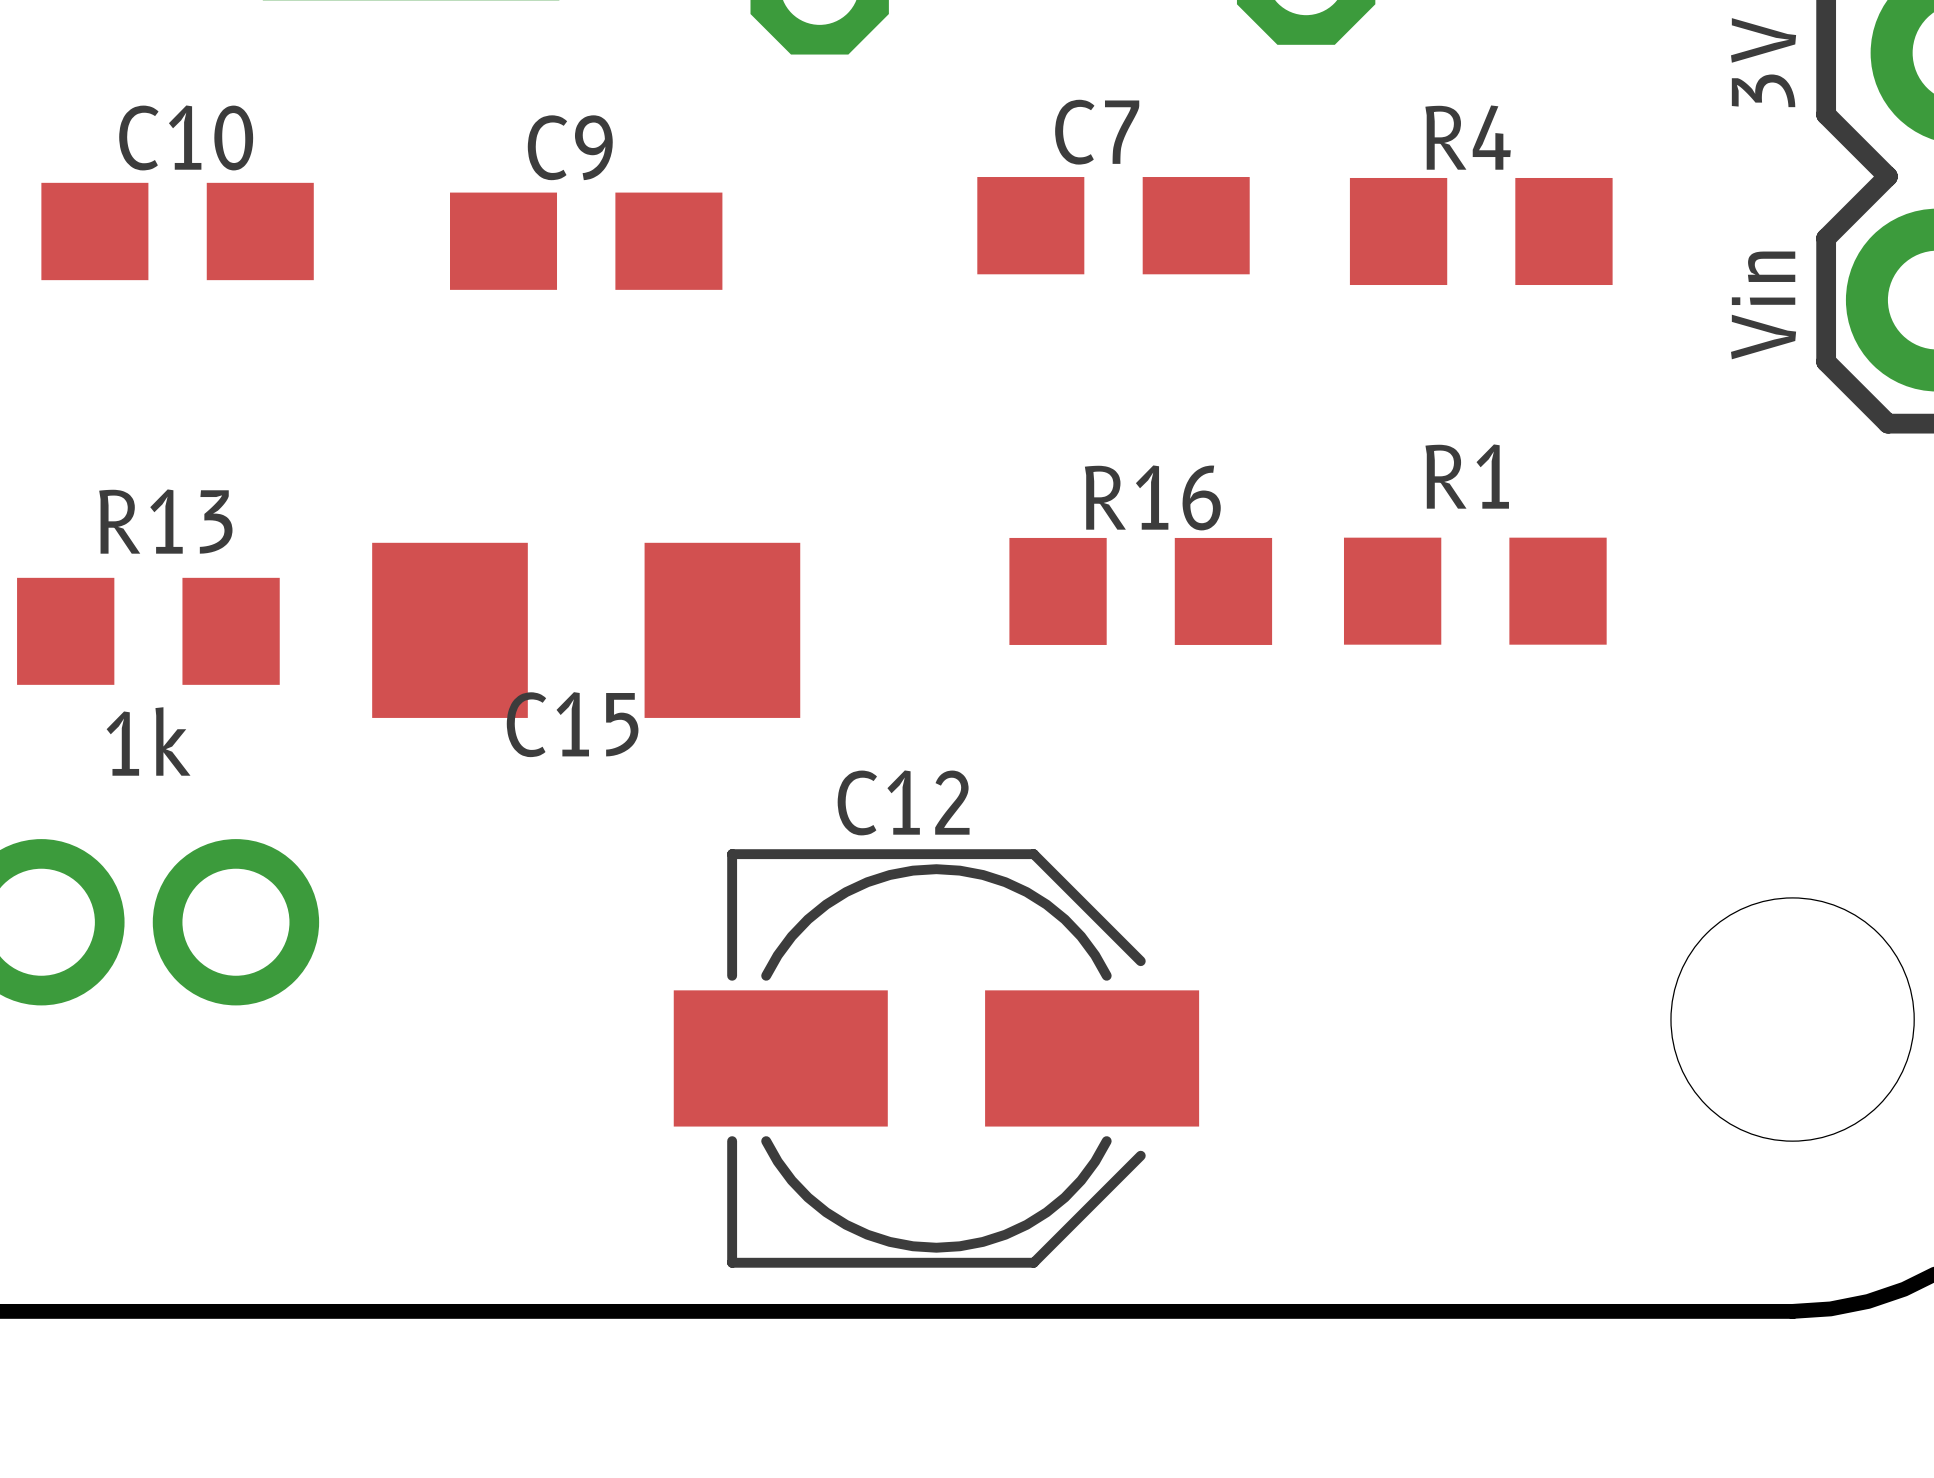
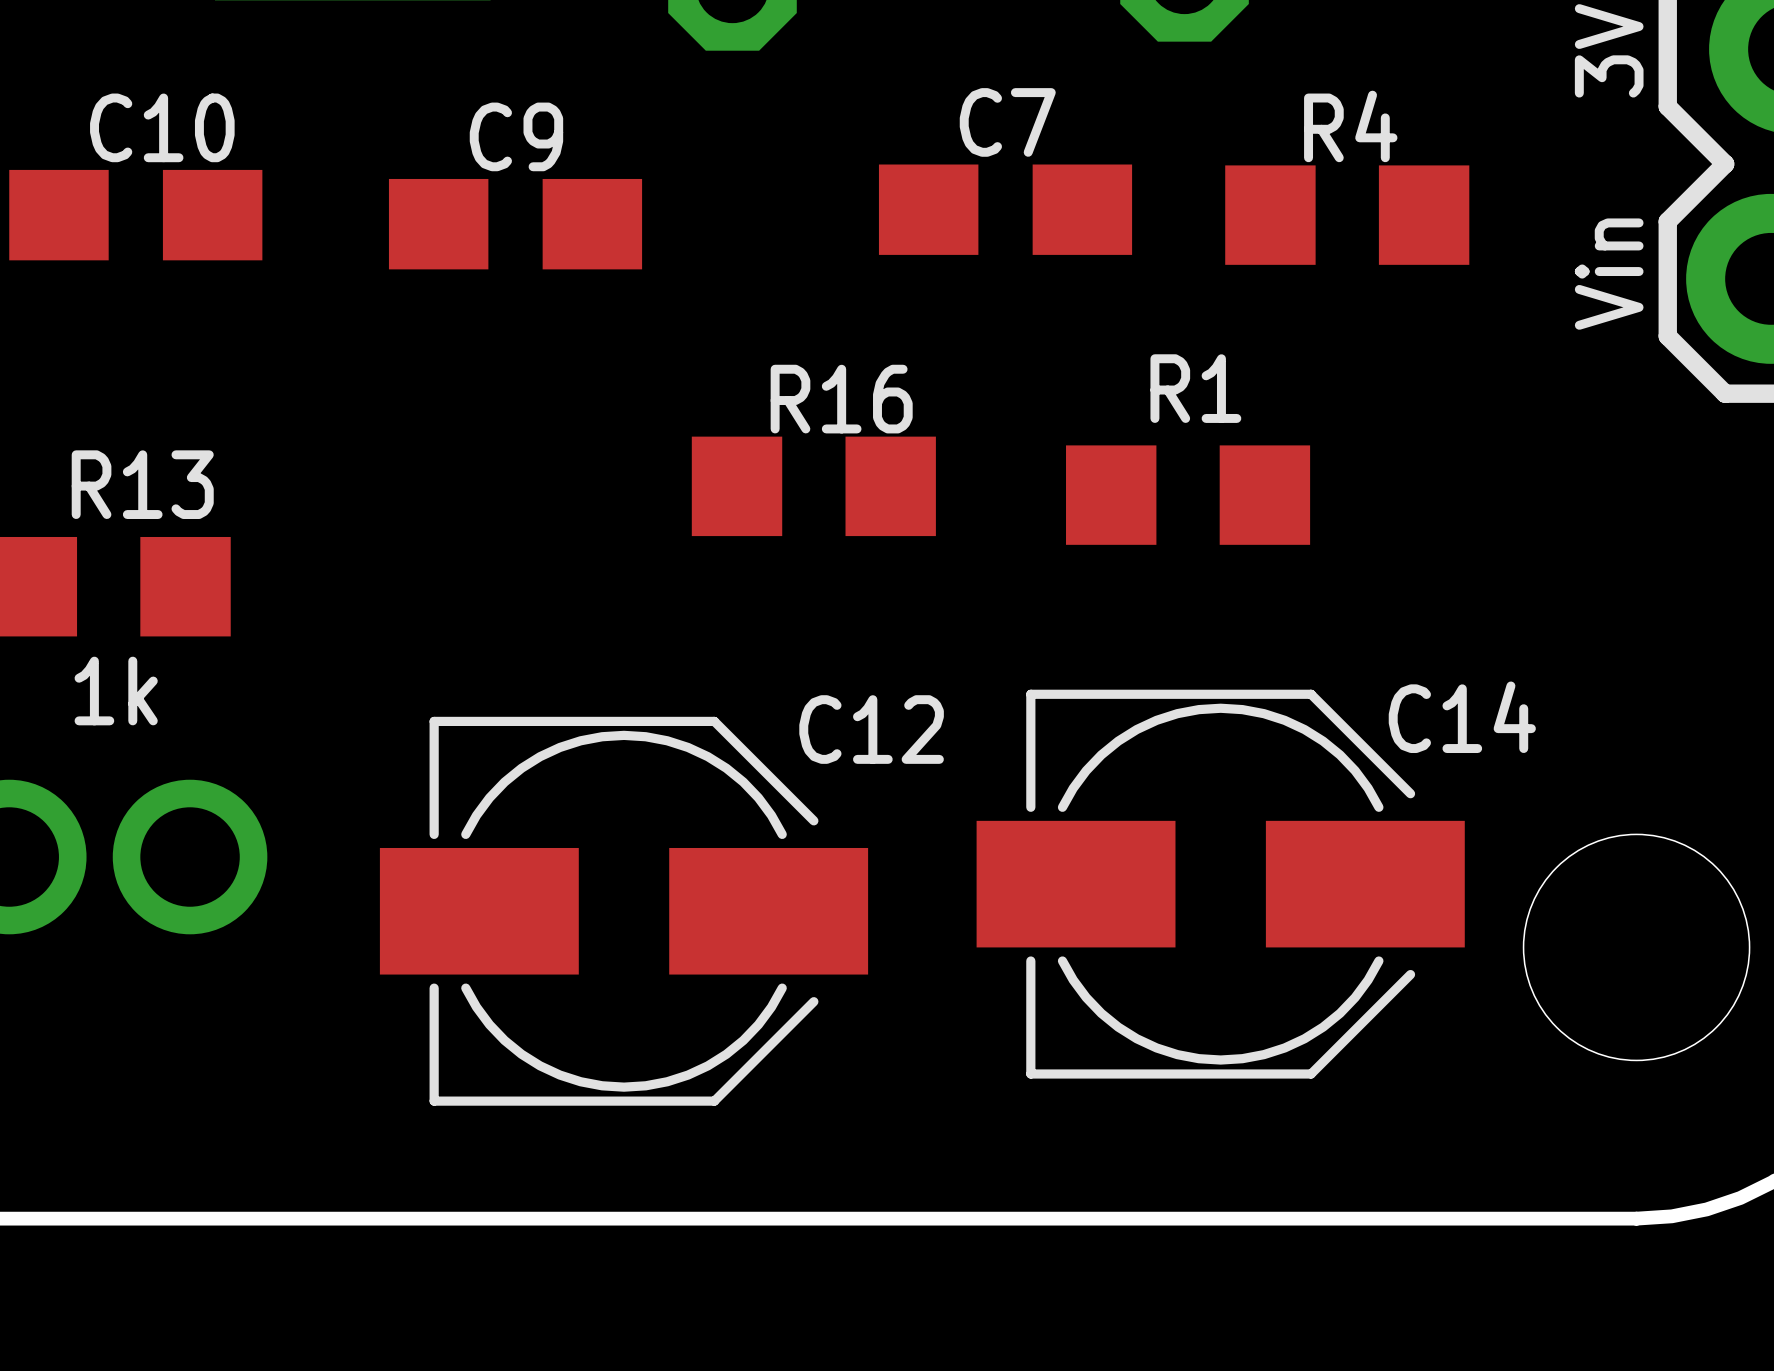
R16 position: (1140, 591) -> (813, 486)
R1 position: (1475, 591) -> (1188, 495)
C15: (586, 630) -> none
C12 name position: C12 (903, 802) -> C12 (871, 729)
C14: none -> (1220, 884)
C12 position: (936, 1058) -> (624, 911)

